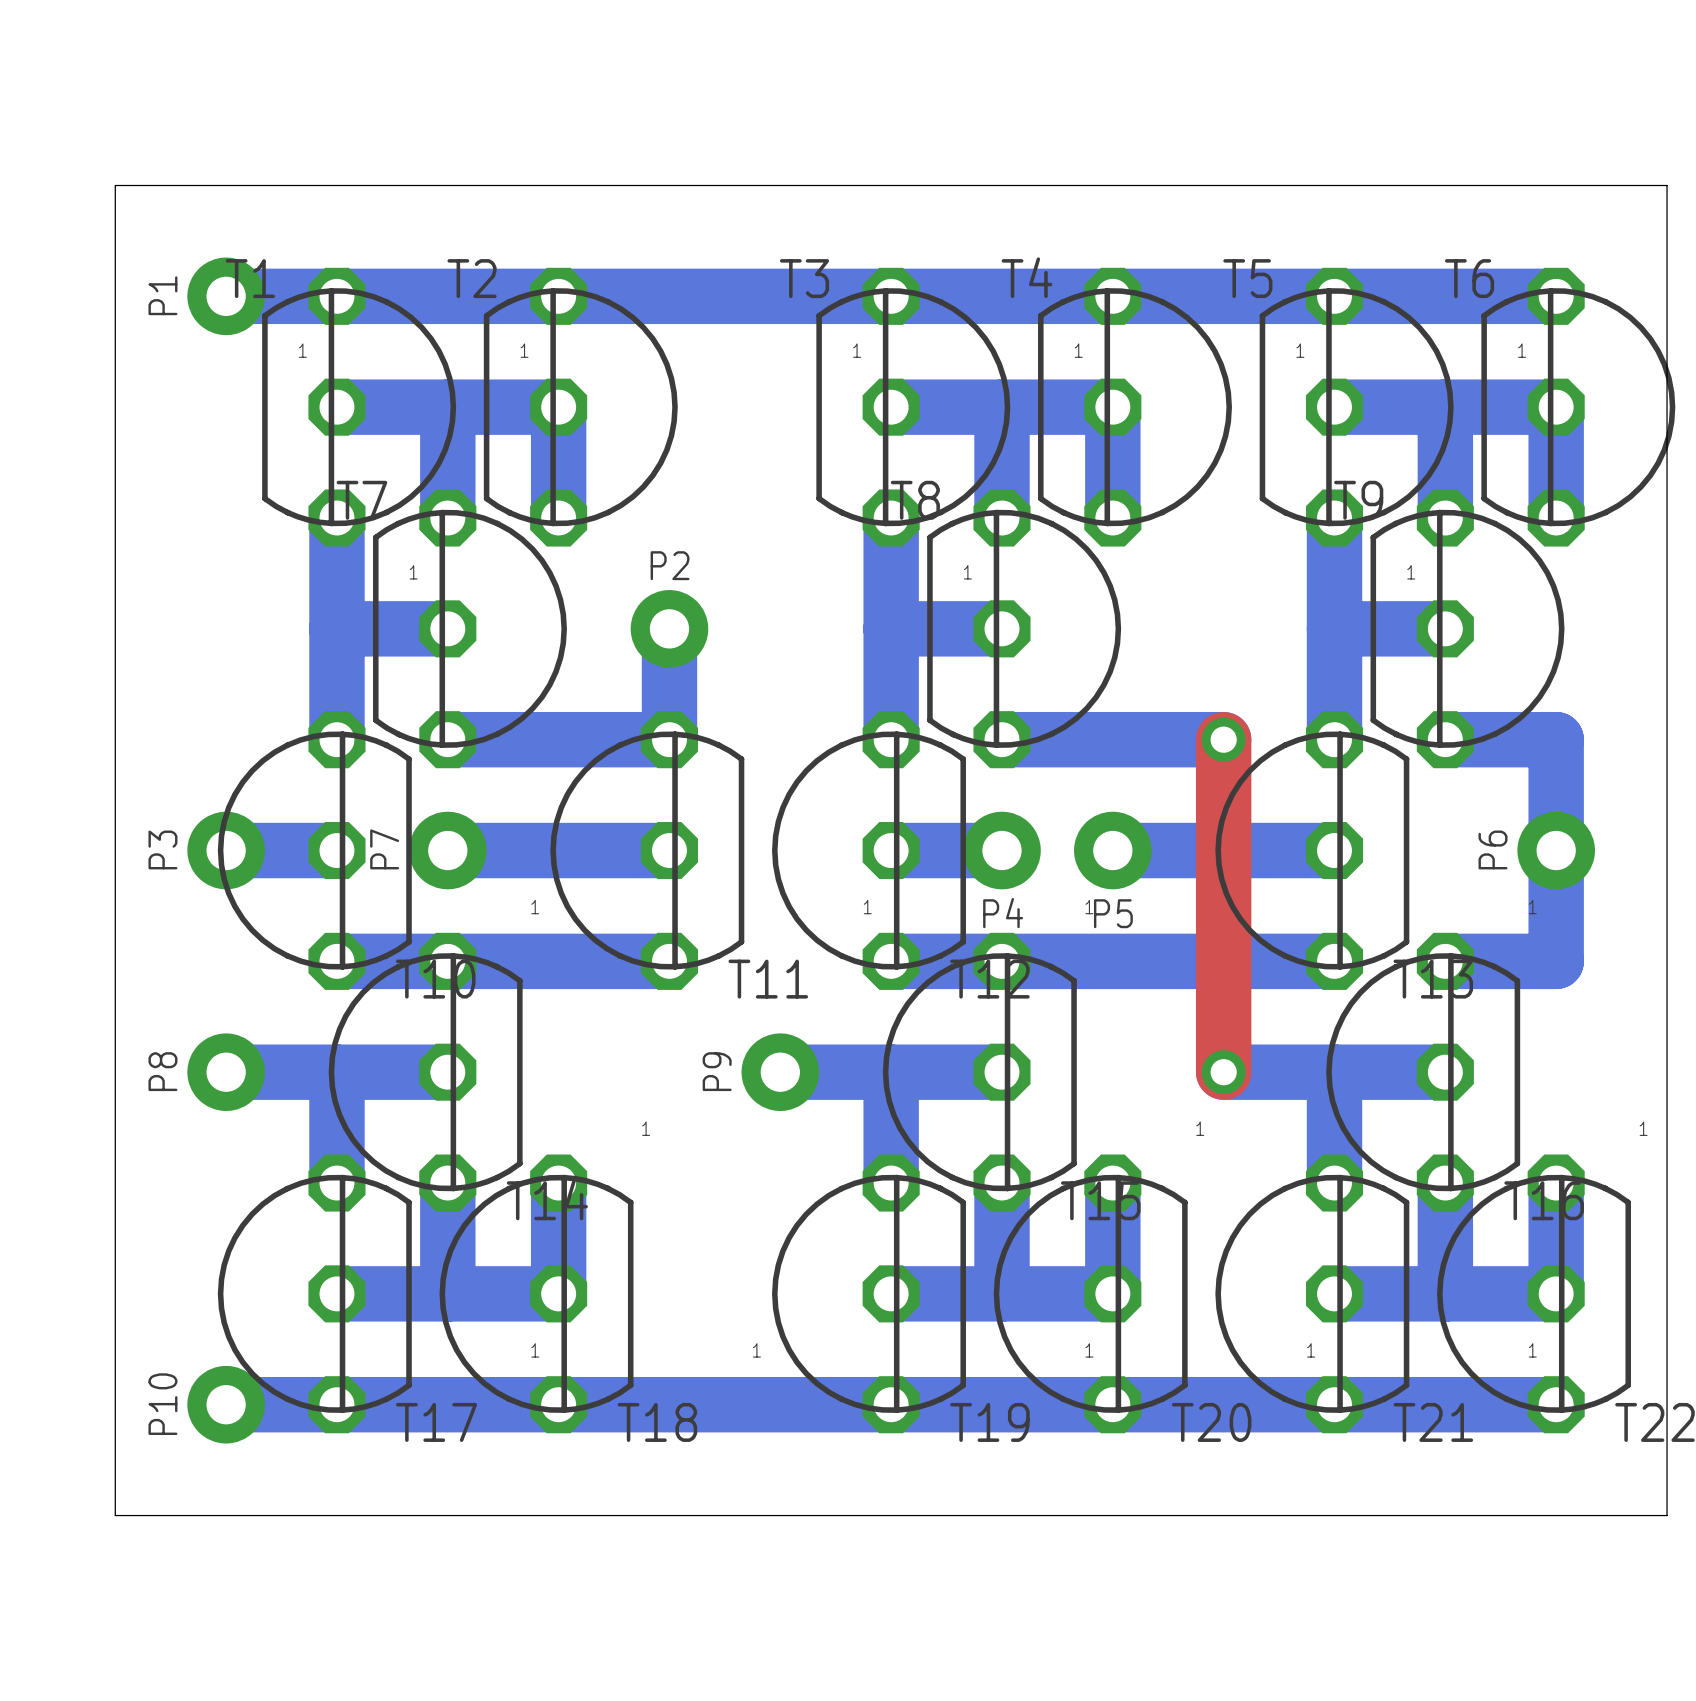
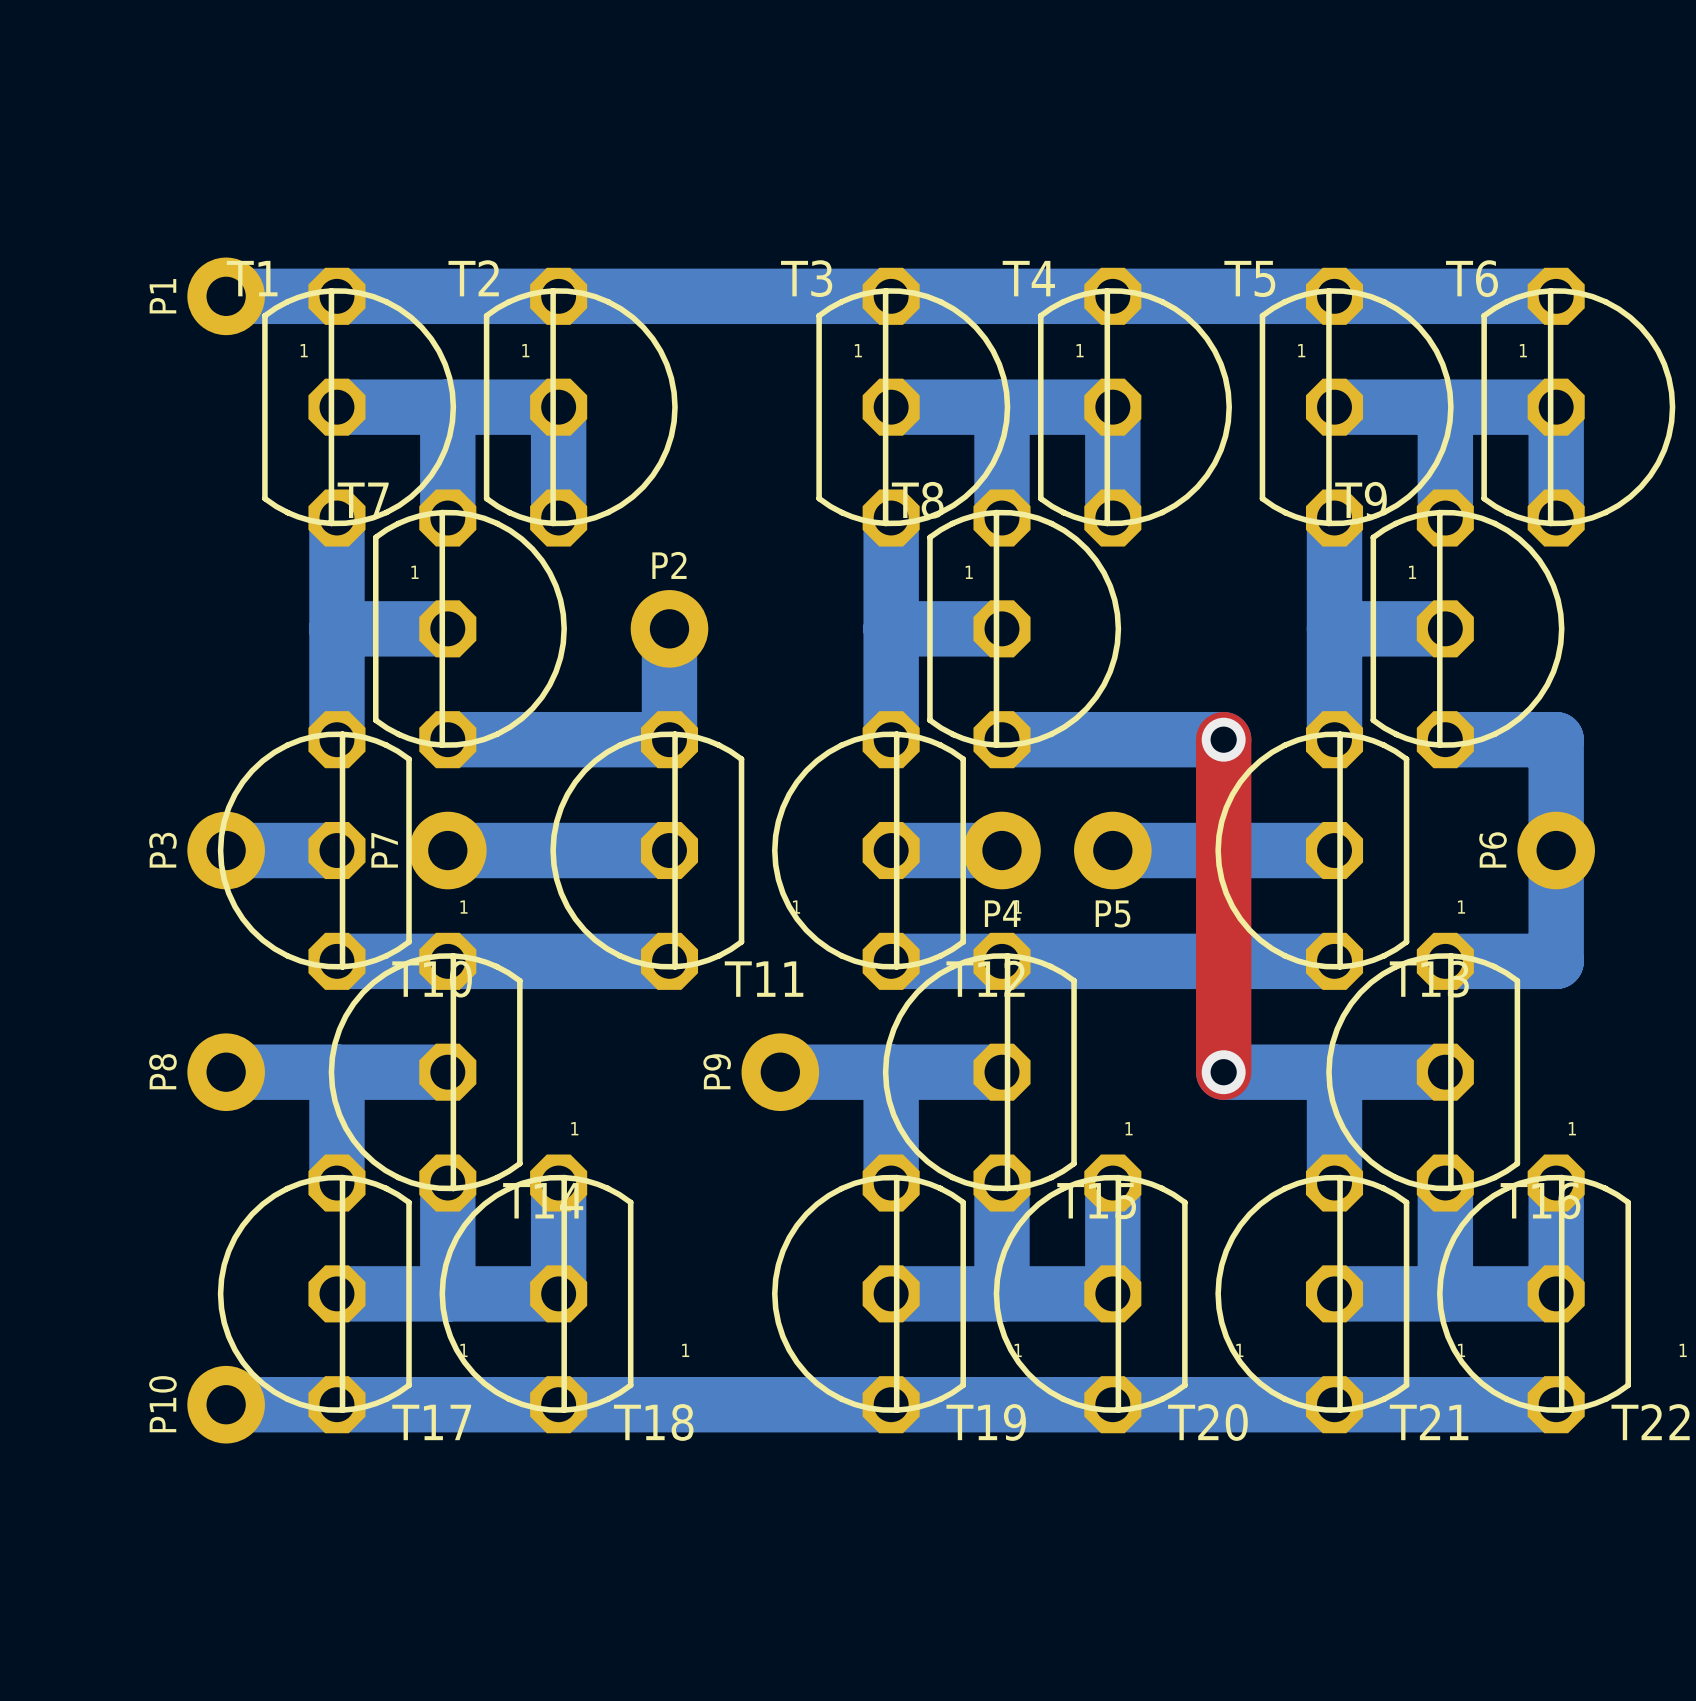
board edge: (115, 185) (1667, 185) (1667, 1515) (115, 1515) (115, 185) -> none

